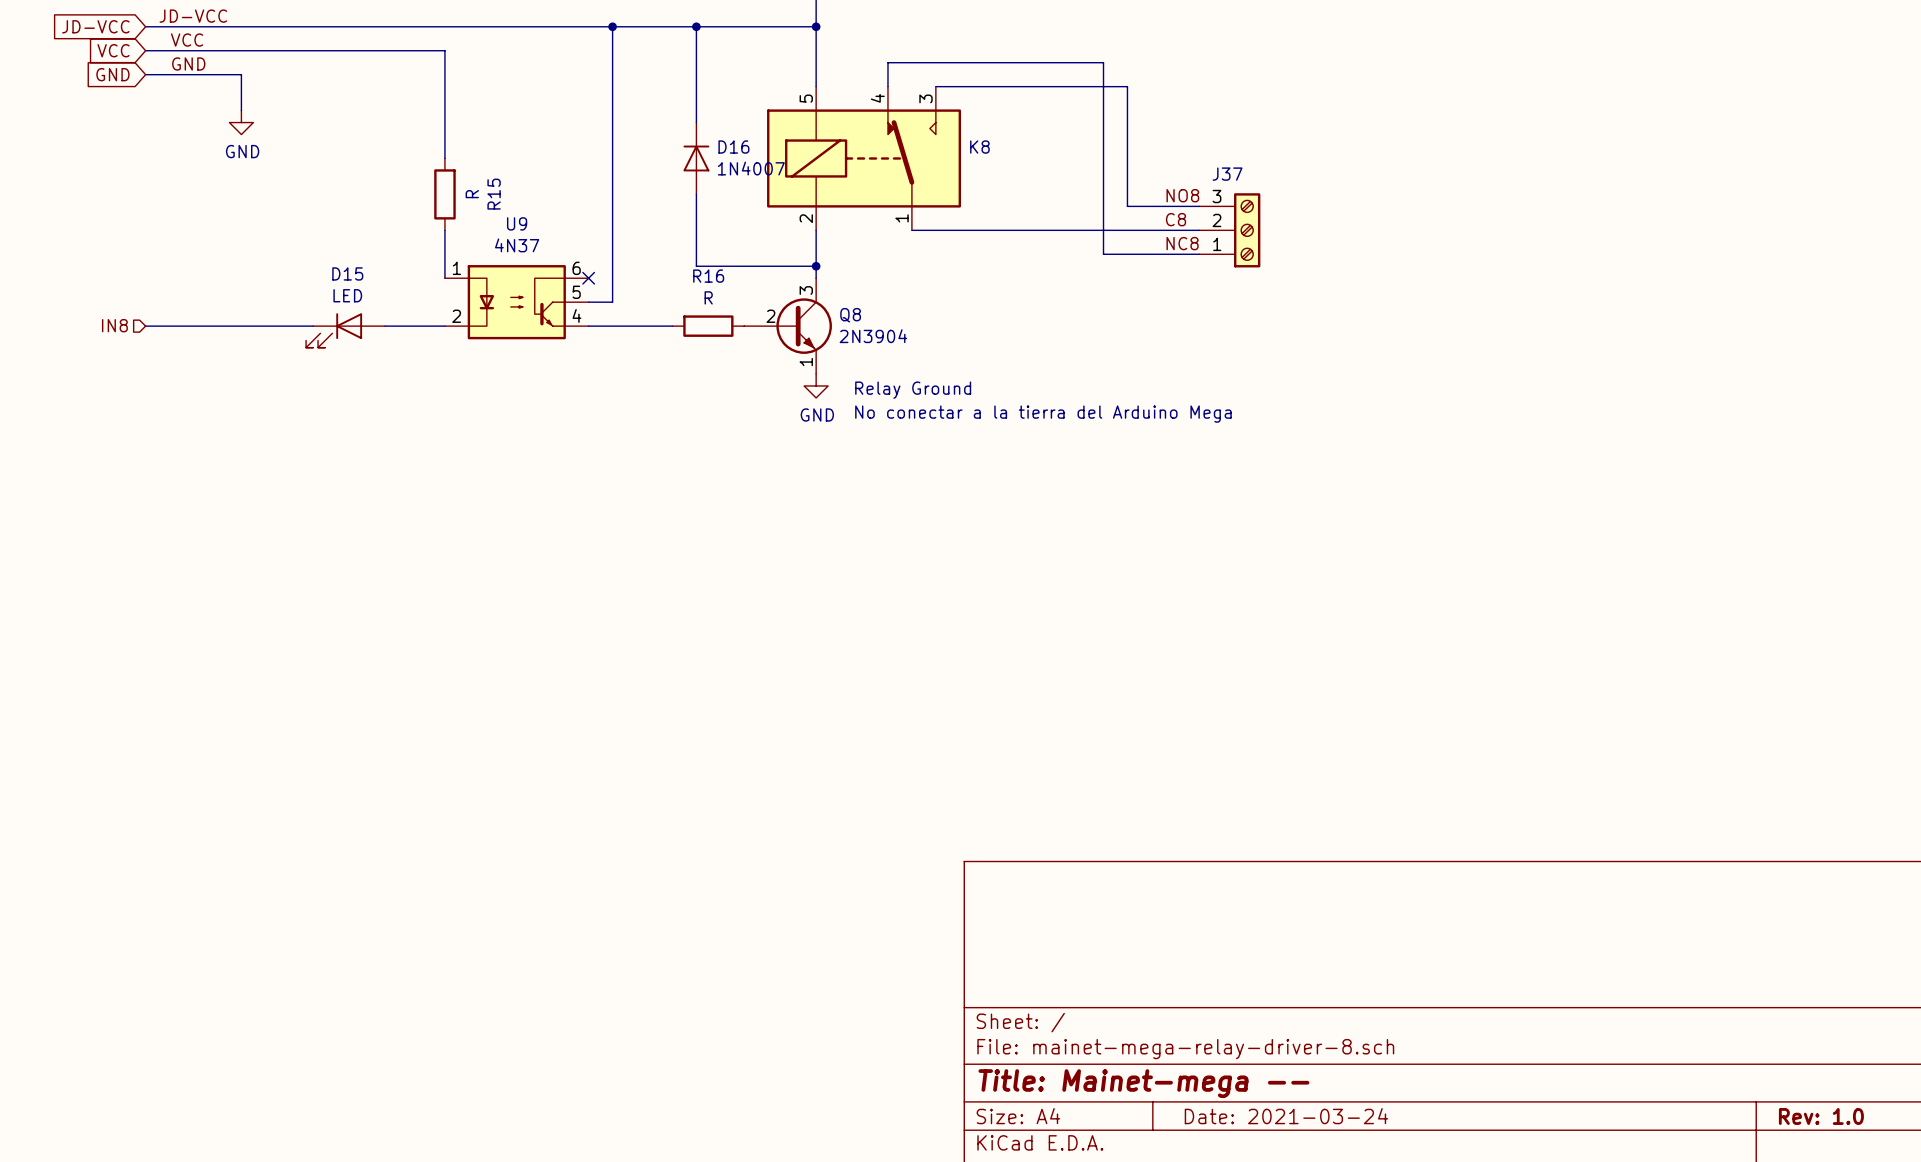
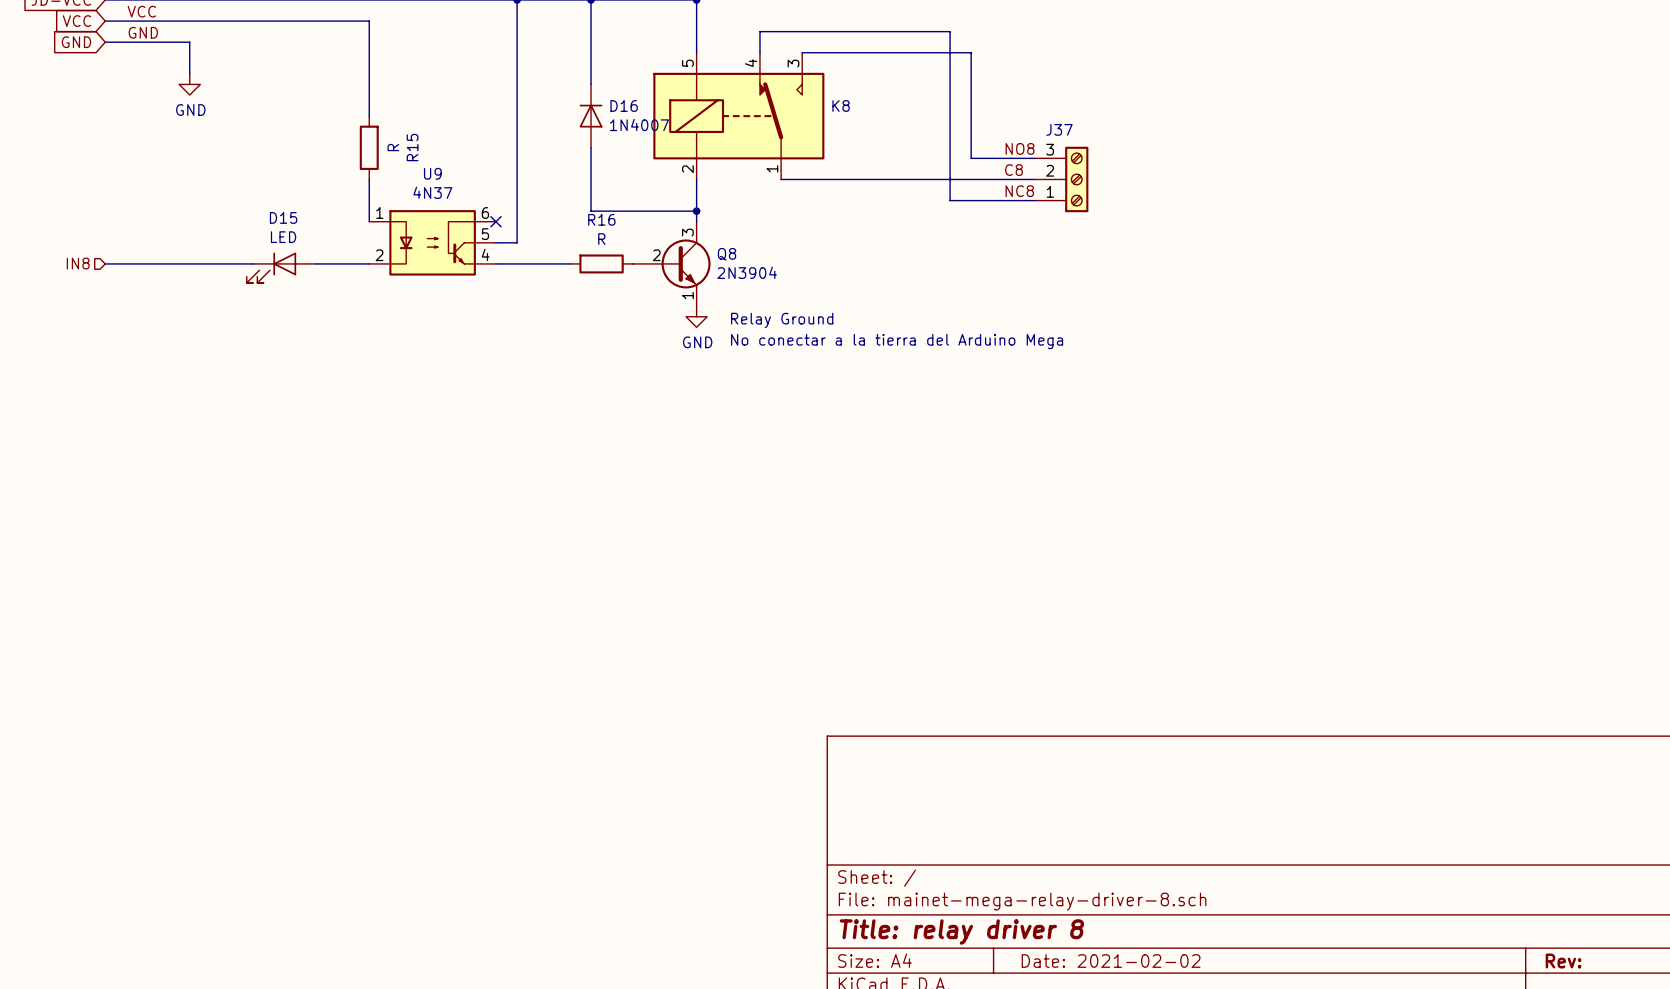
title block: Title: Mainet-mega -- (1143, 1083) -> Title: relay driver 8 (961, 932)
title block: Date: 2021-03-24 (1286, 1116) -> Date: 2021-02-02 (1111, 961)
title block: Rev: 1.0 (1821, 1116) -> Rev: (1563, 961)

